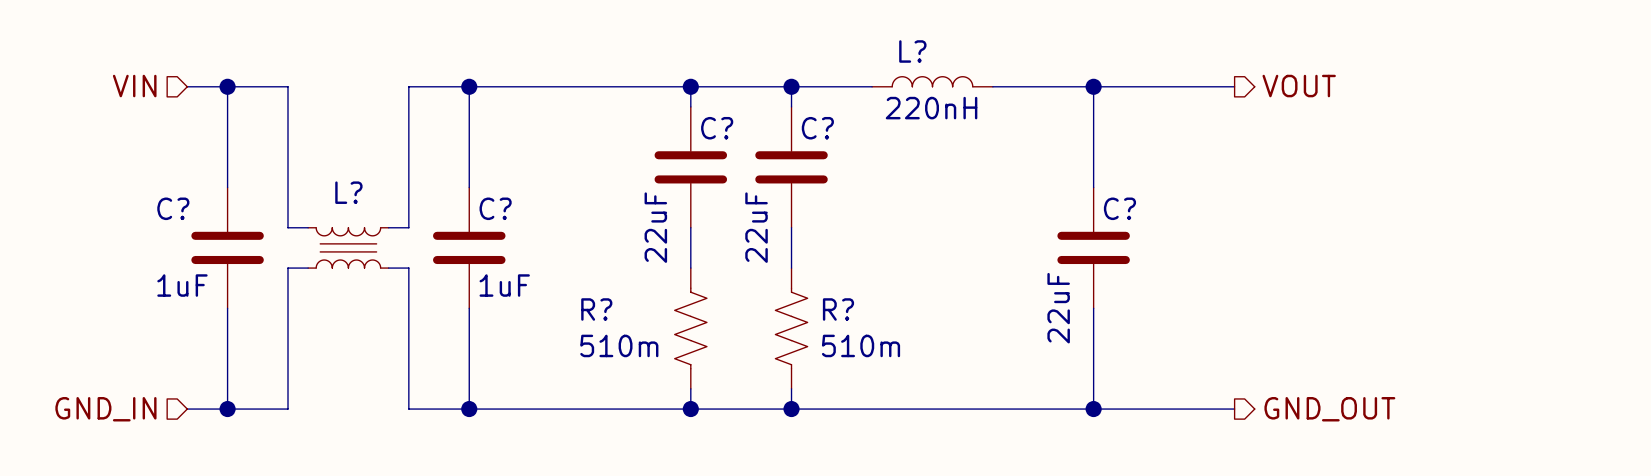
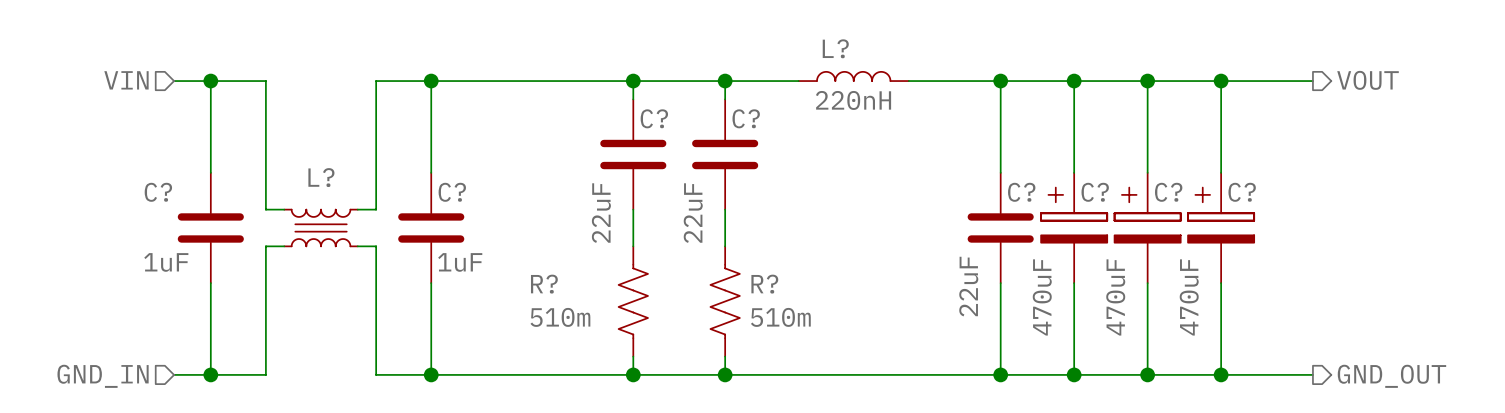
wire: none -> (1074, 81) (1074, 172)
junction: none -> (1074, 81)
wire: none -> (1129, 81) (1312, 81)
wire: none -> (1147, 81) (1147, 172)
junction: none -> (1147, 81)
hierarchical label position: VOUT (1299, 86) -> VOUT (1368, 80)
wire: none -> (1221, 81) (1221, 172)
junction: none -> (1221, 81)
C?: none -> (1074, 227)
C?: none -> (1147, 227)
C?: none -> (1221, 227)
wire: none -> (1074, 283) (1074, 374)
wire: none -> (1147, 283) (1147, 374)
wire: none -> (1221, 283) (1221, 374)
junction: none -> (1074, 374)
wire: none -> (1129, 374) (1312, 374)
junction: none -> (1147, 374)
hierarchical label position: GND_OUT (1329, 409) -> GND_OUT (1391, 376)
junction: none -> (1221, 374)

